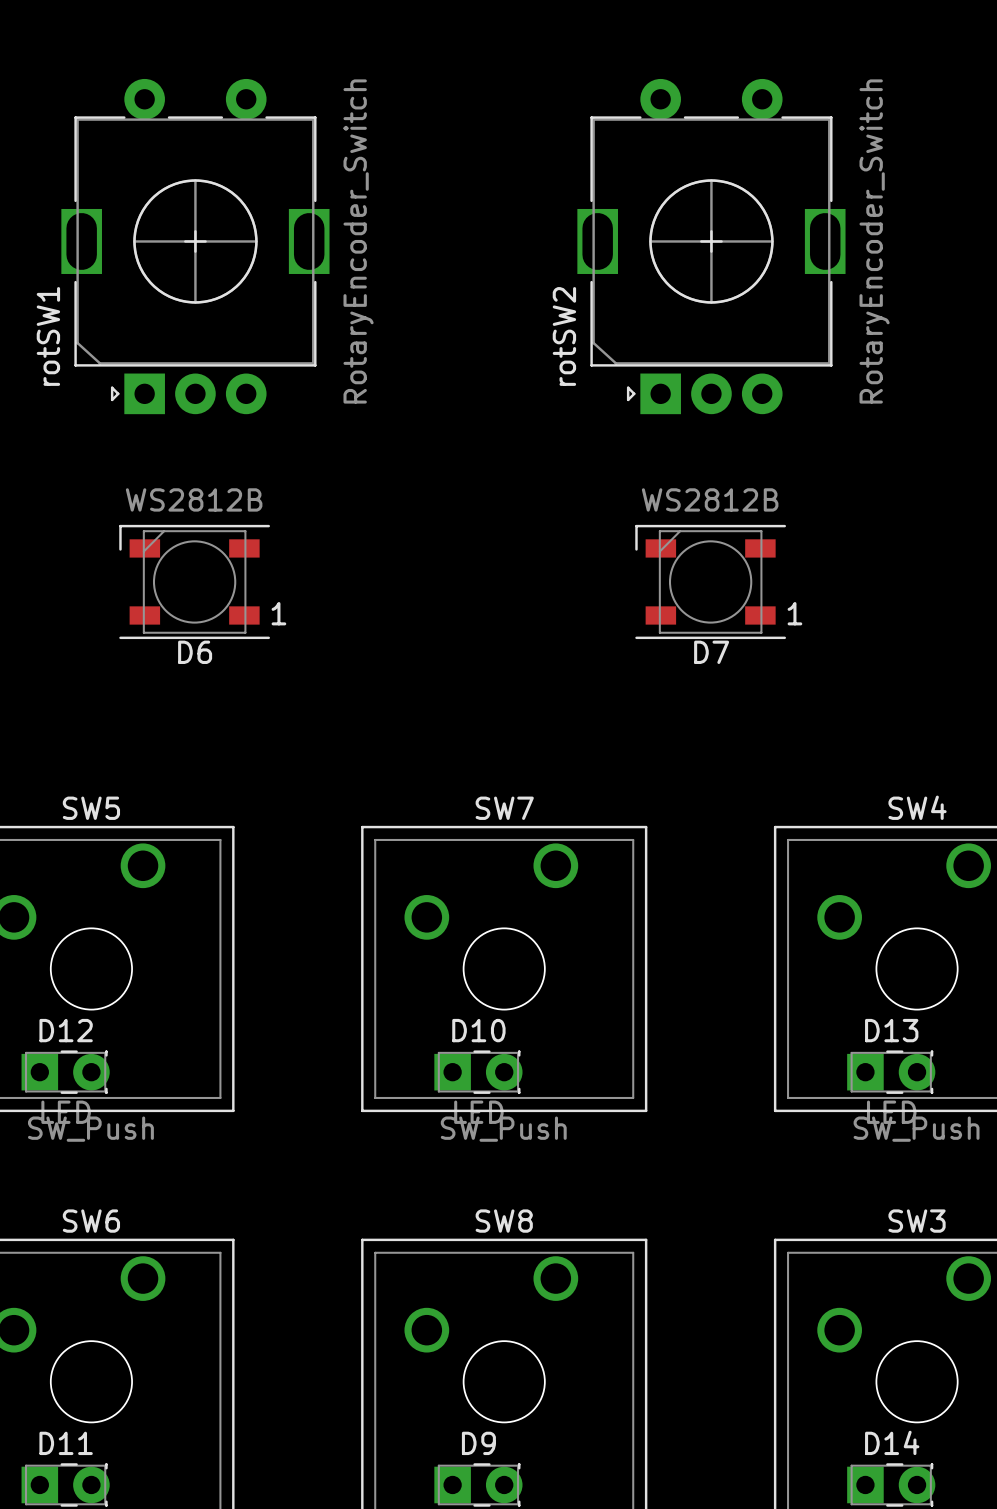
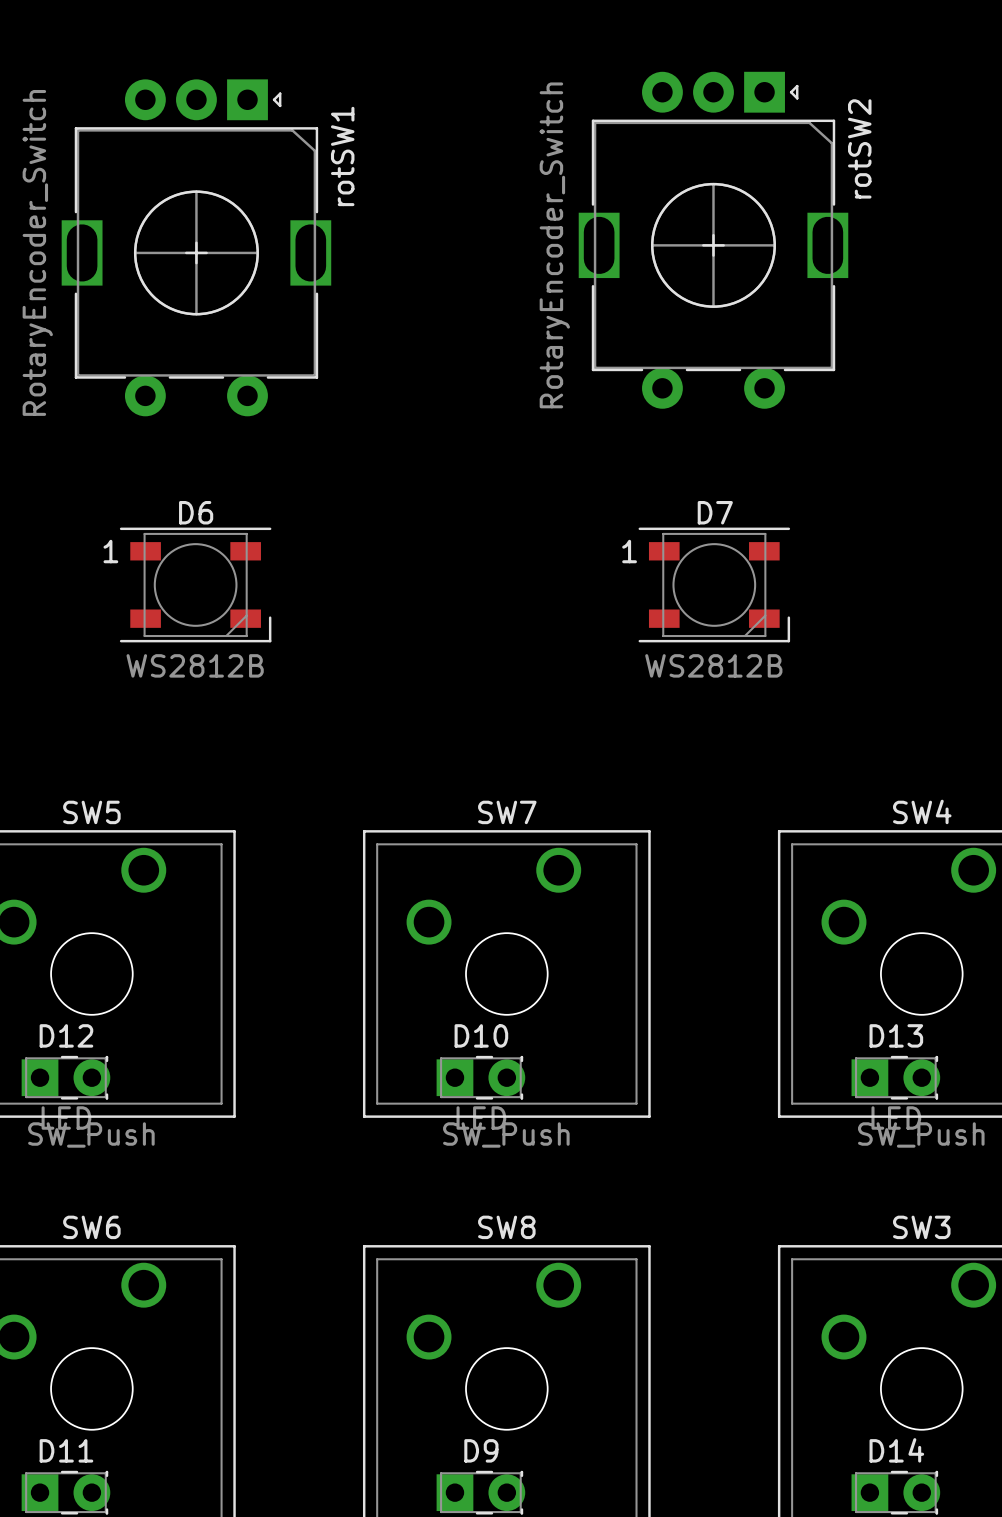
rotSW1 rotation: 0° (195, 246) -> 180° (196, 247)
rotSW2 rotation: 0° (711, 246) -> 180° (713, 240)
D6 rotation: 0° (194, 581) -> 180° (195, 584)
D7 rotation: 0° (710, 581) -> 180° (714, 584)

